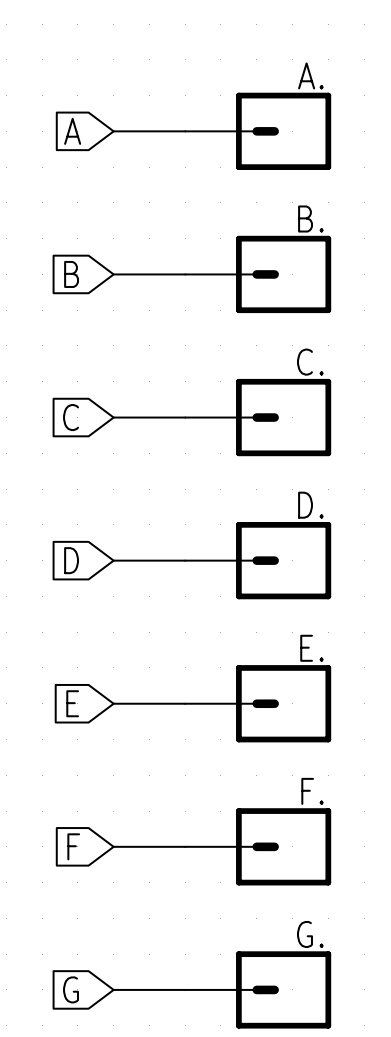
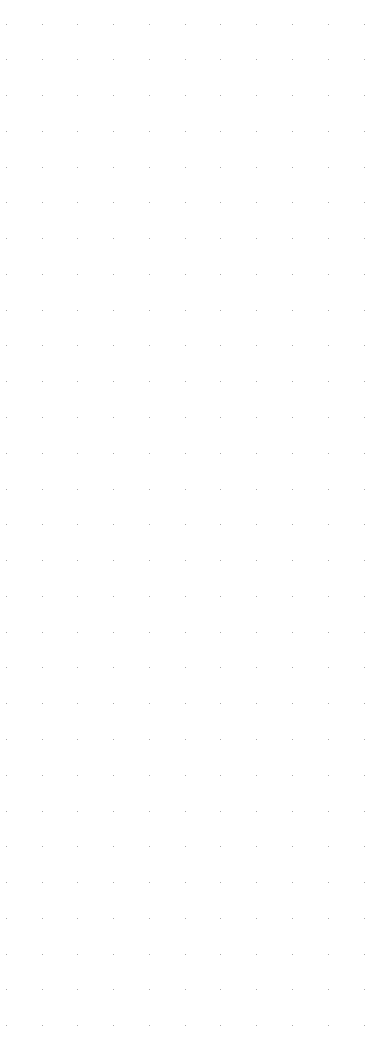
global label: A (72, 131) -> none
wire: (113, 131) (185, 131) -> none
A.: (258, 131) -> none
global label: B (71, 274) -> none
wire: (113, 274) (185, 274) -> none
B.: (258, 274) -> none
global label: C (71, 417) -> none
wire: (113, 417) (185, 417) -> none
C.: (258, 417) -> none
global label: D (71, 560) -> none
wire: (113, 560) (185, 560) -> none
D.: (258, 560) -> none
global label: E (72, 703) -> none
wire: (113, 703) (185, 703) -> none
E.: (258, 703) -> none
global label: F (73, 846) -> none
wire: (113, 846) (185, 846) -> none
F.: (258, 846) -> none
global label: G (71, 989) -> none
wire: (113, 989) (185, 989) -> none
G.: (258, 989) -> none

